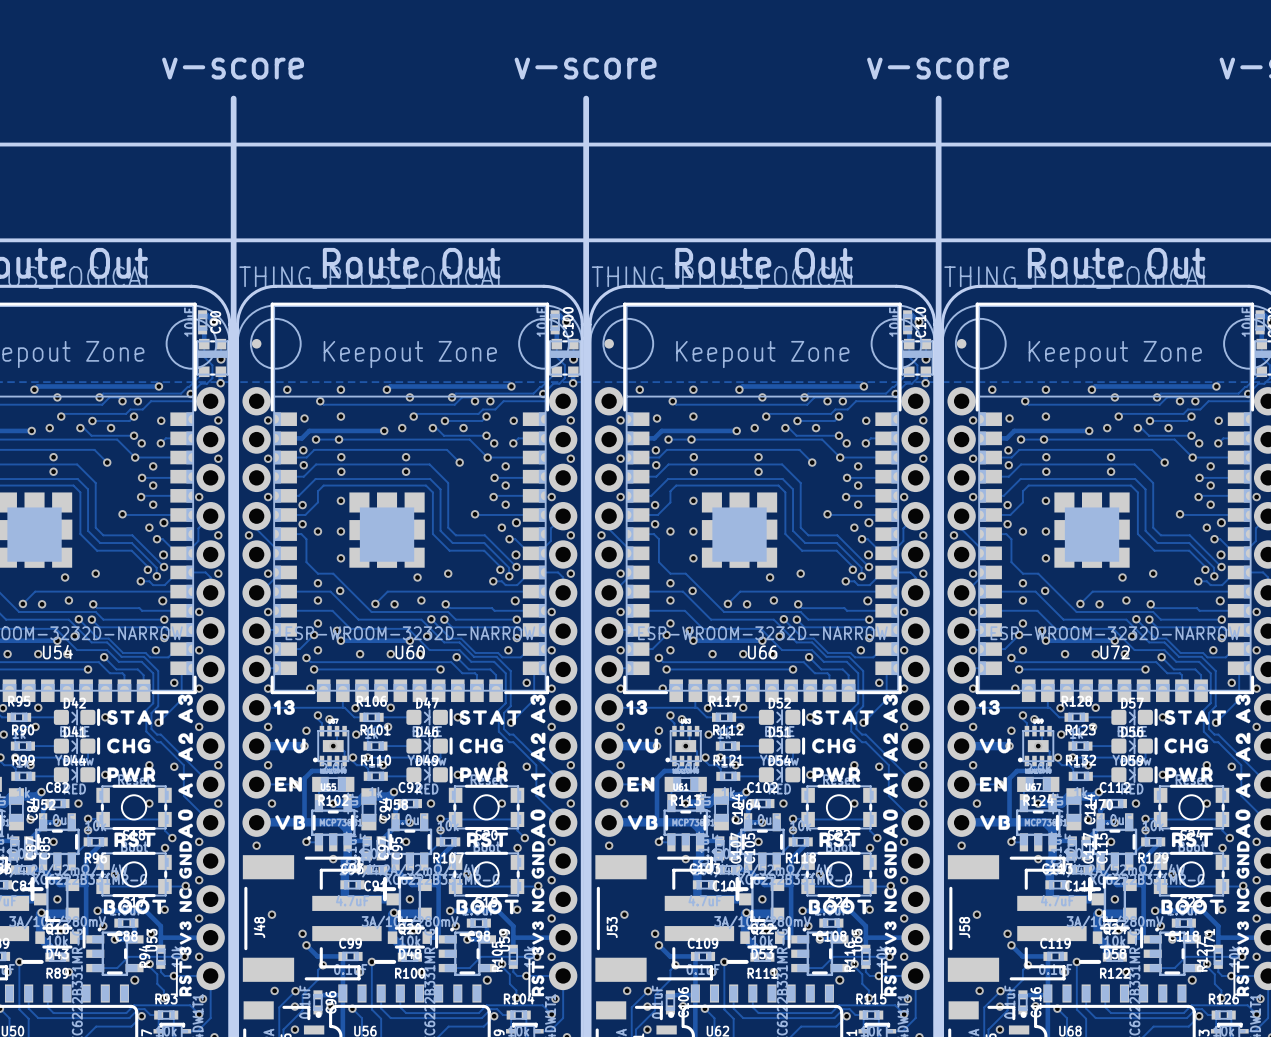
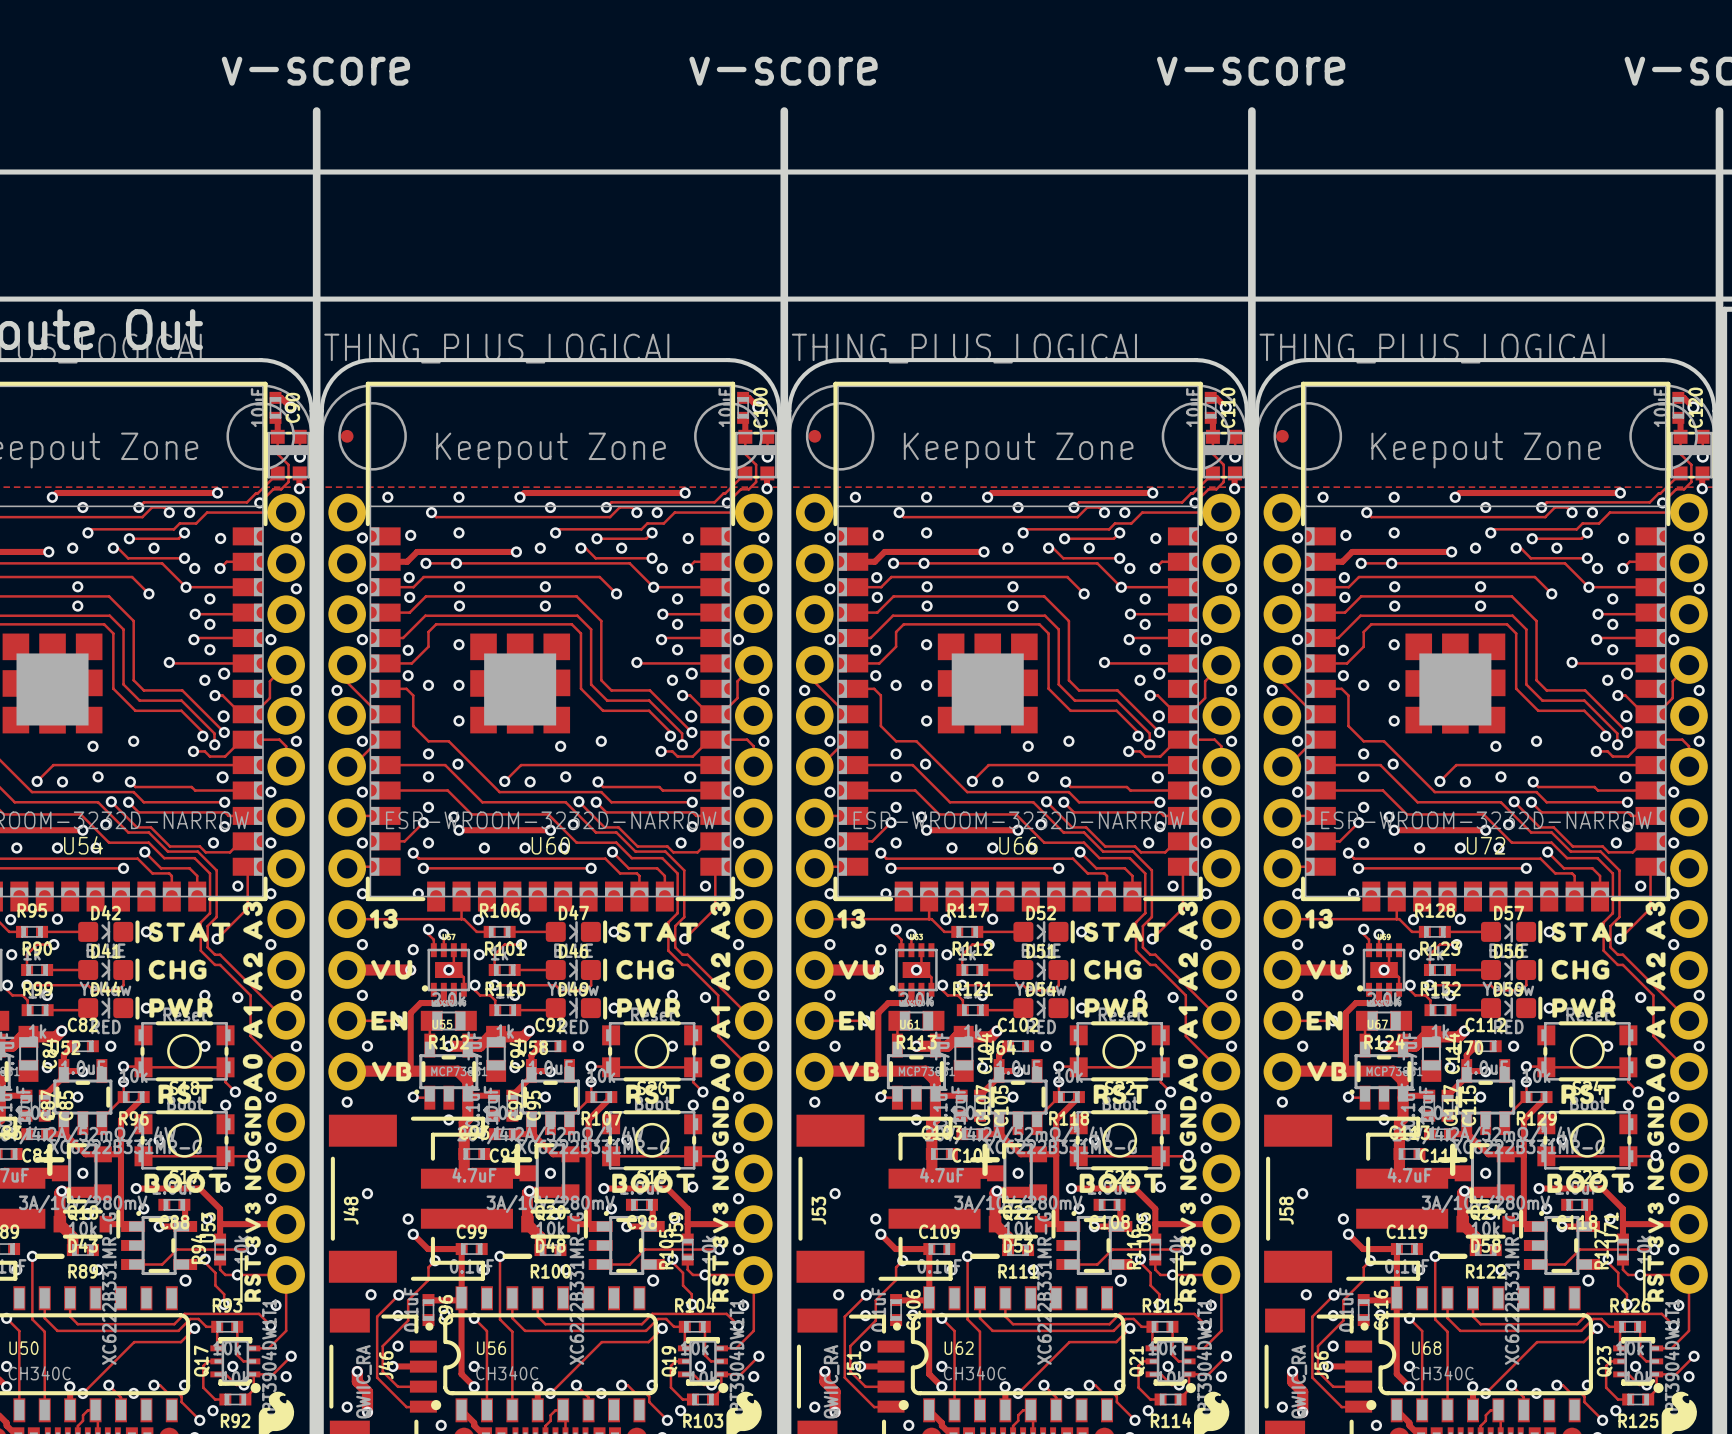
text: Route Out (411, 263) -> none
text: Route Out (764, 263) -> none
text: Route Out (1116, 263) -> none

